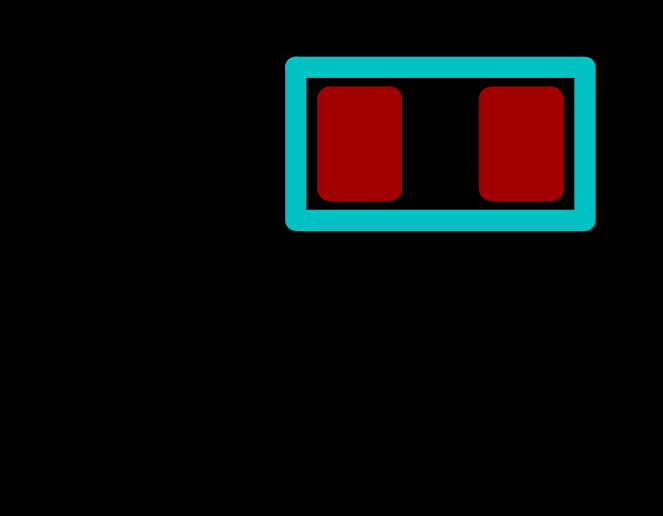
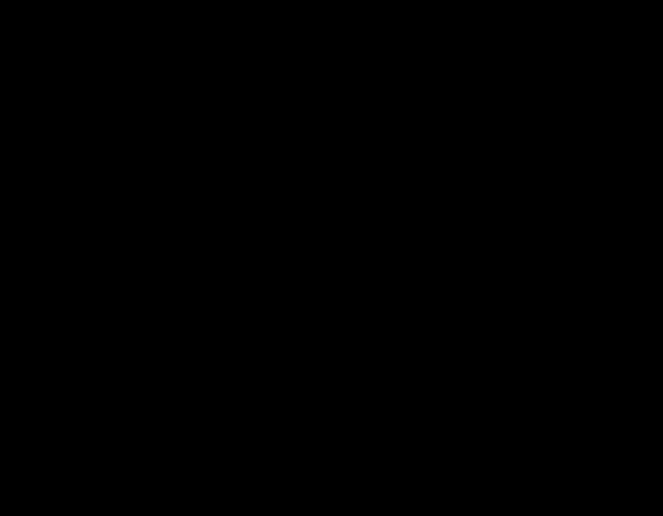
part: (440, 143) -> none

